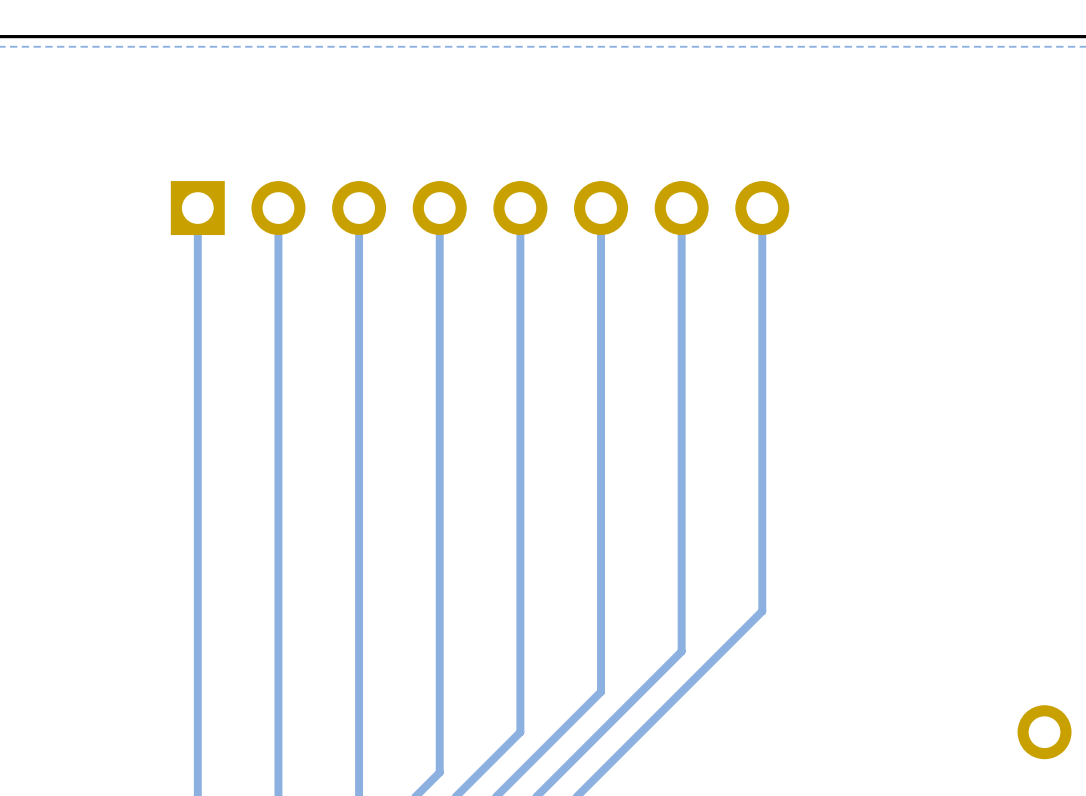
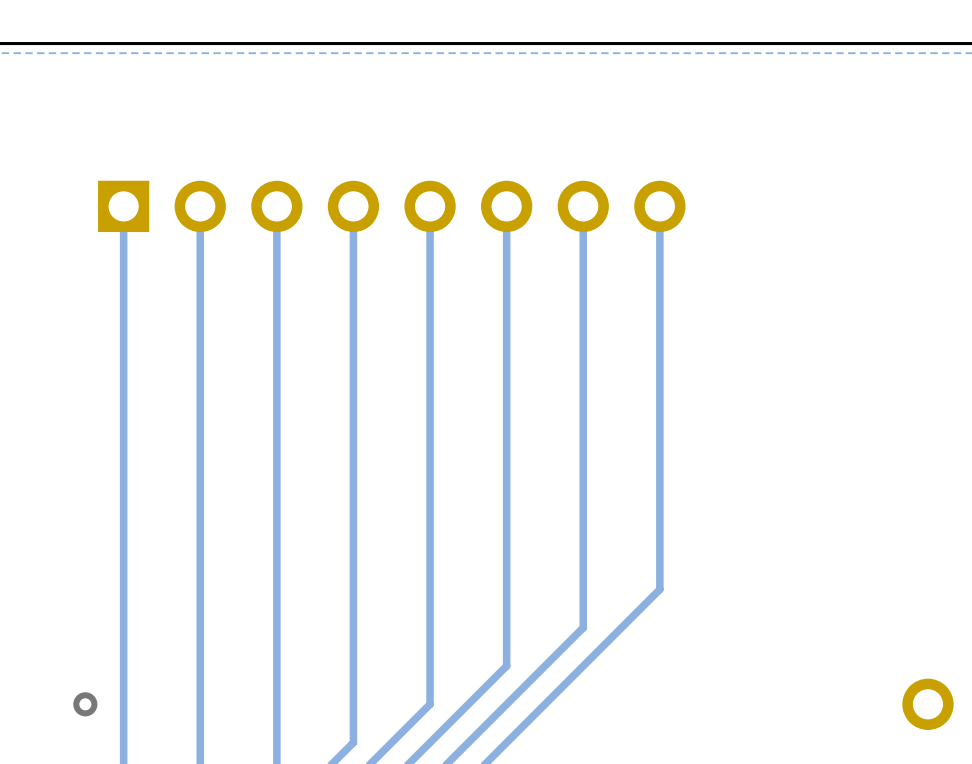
via: none -> (85, 704)

